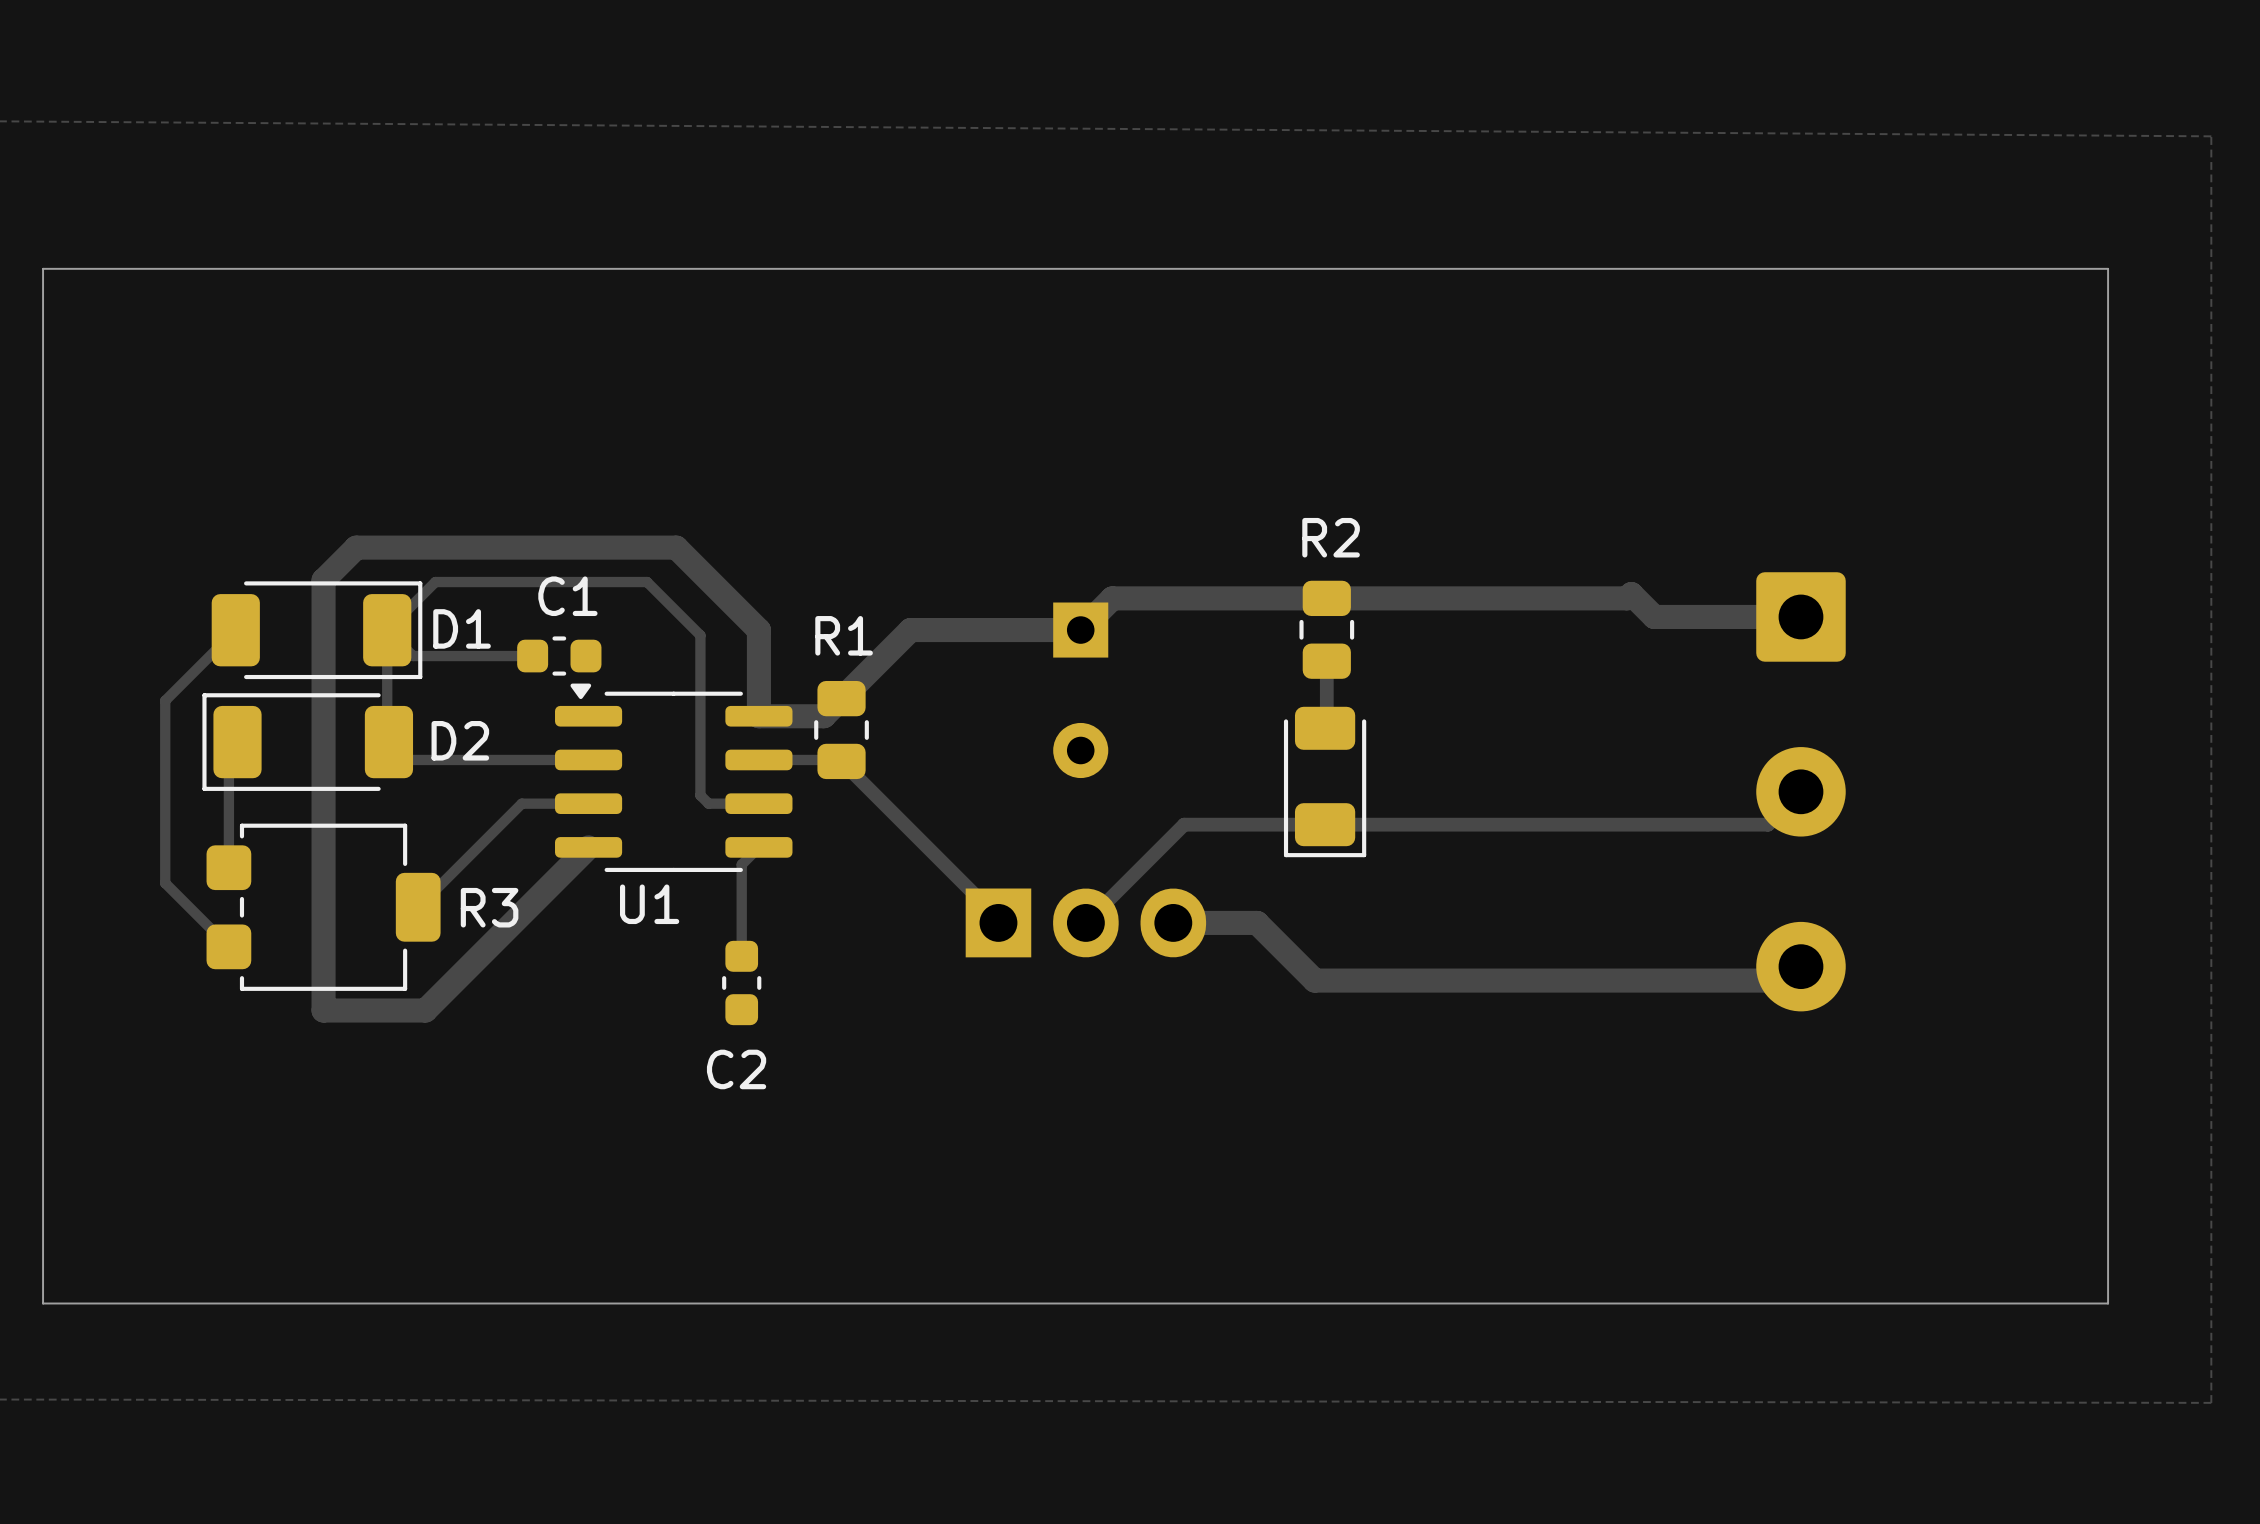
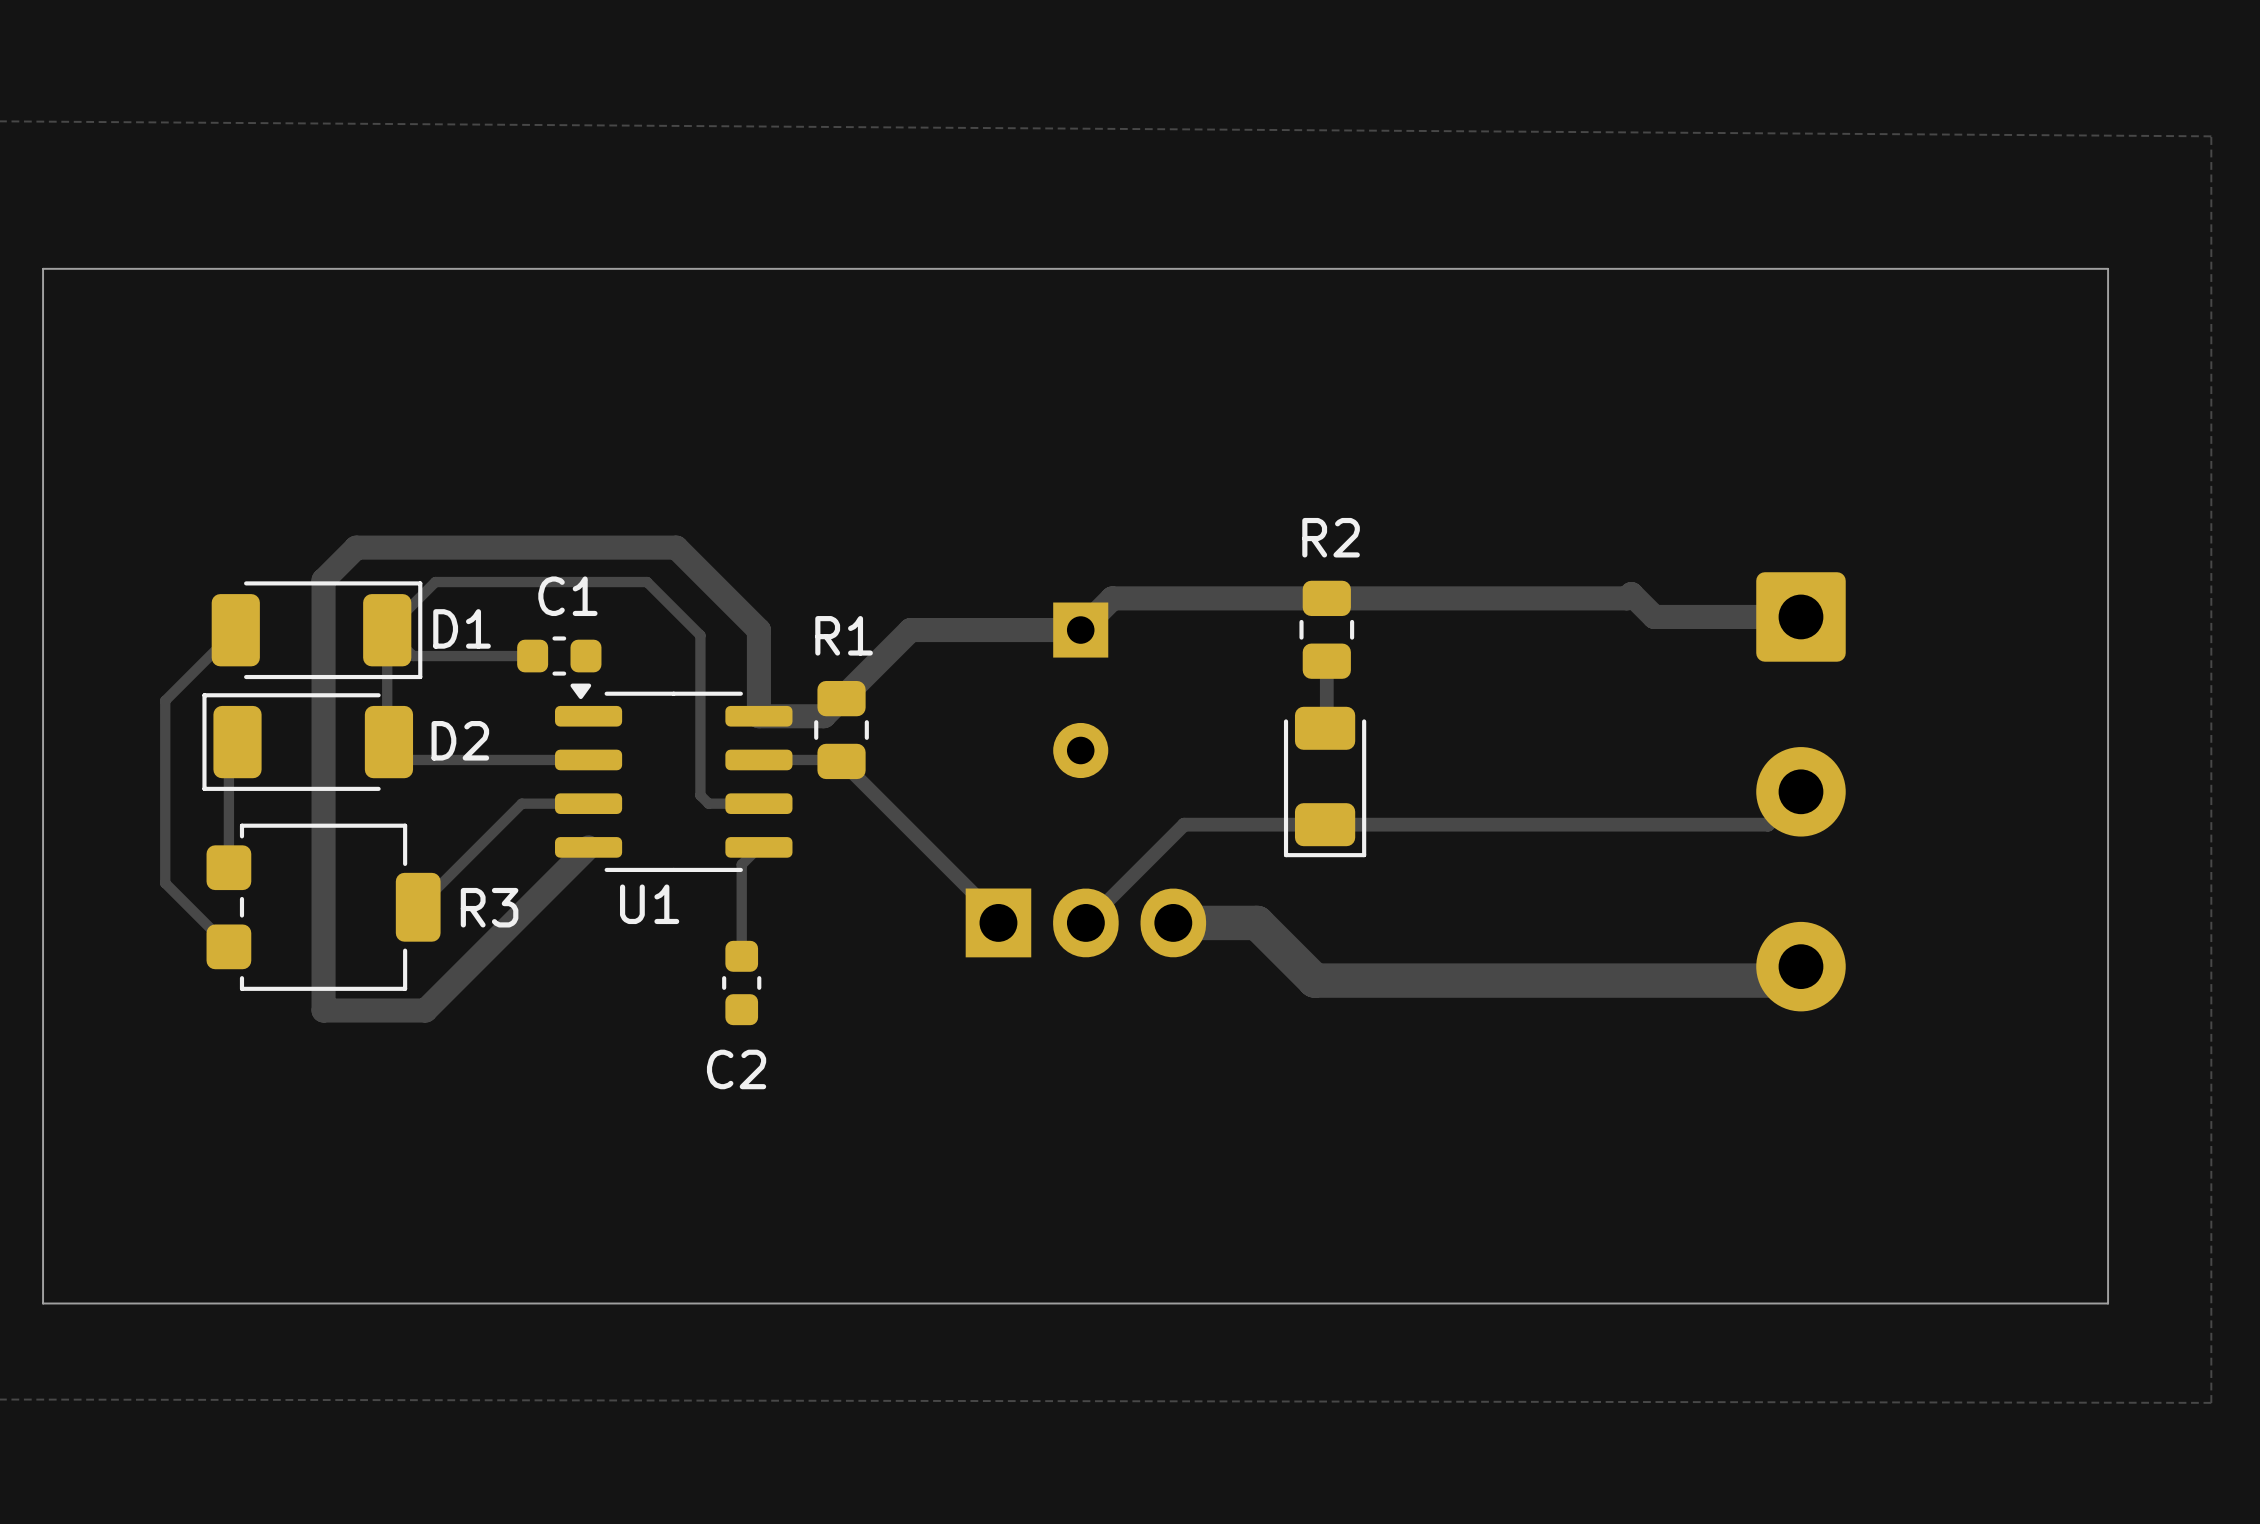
track width: thin (1173, 922) (1257, 922) (1314, 980) (1776, 980) -> thick (1173, 922) (1257, 922) (1314, 980) (1776, 980)

